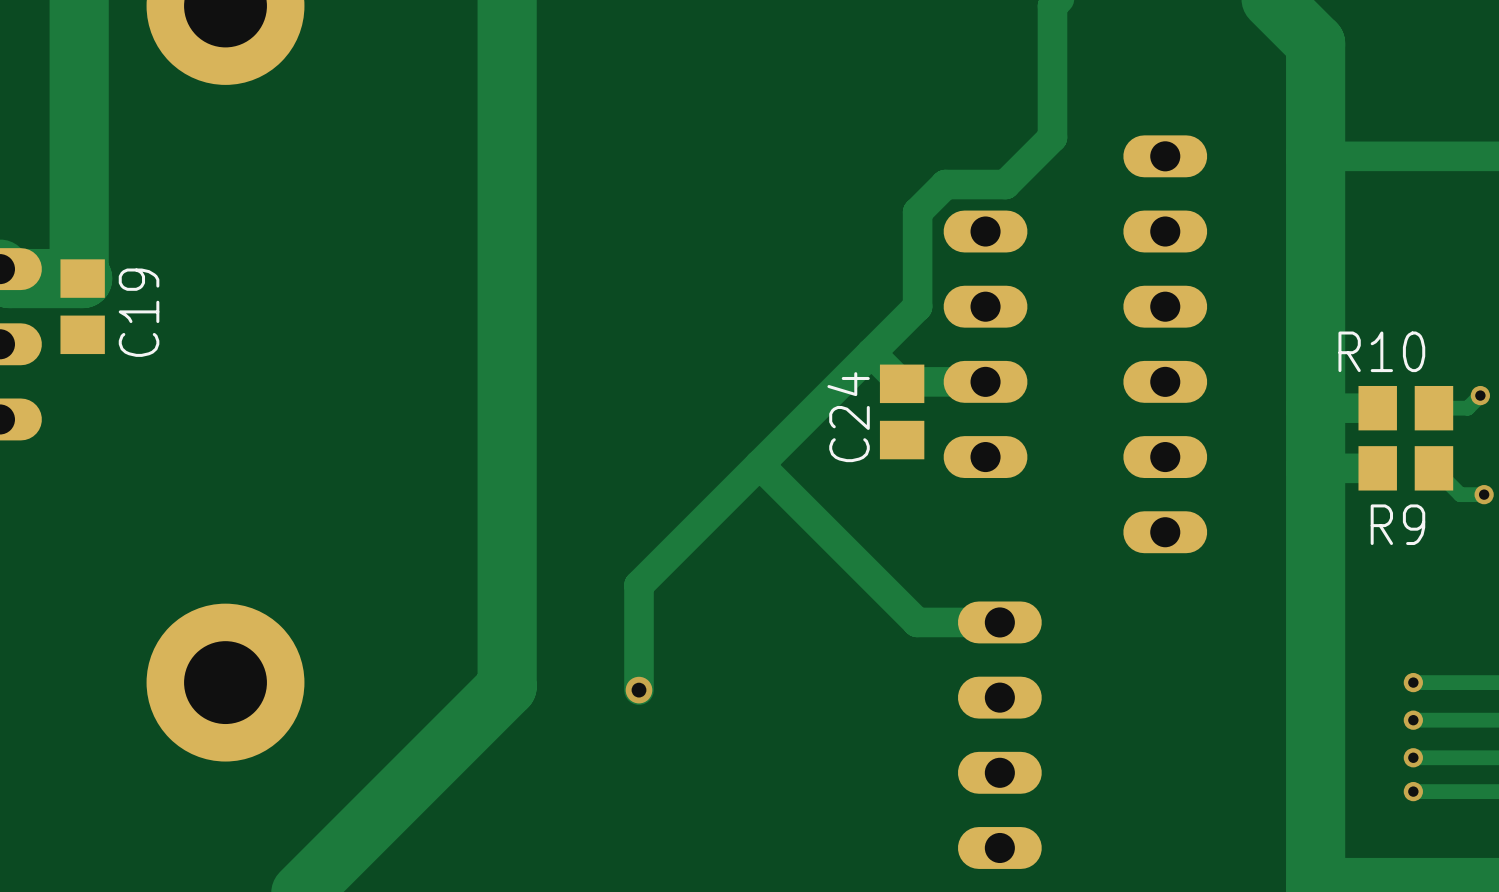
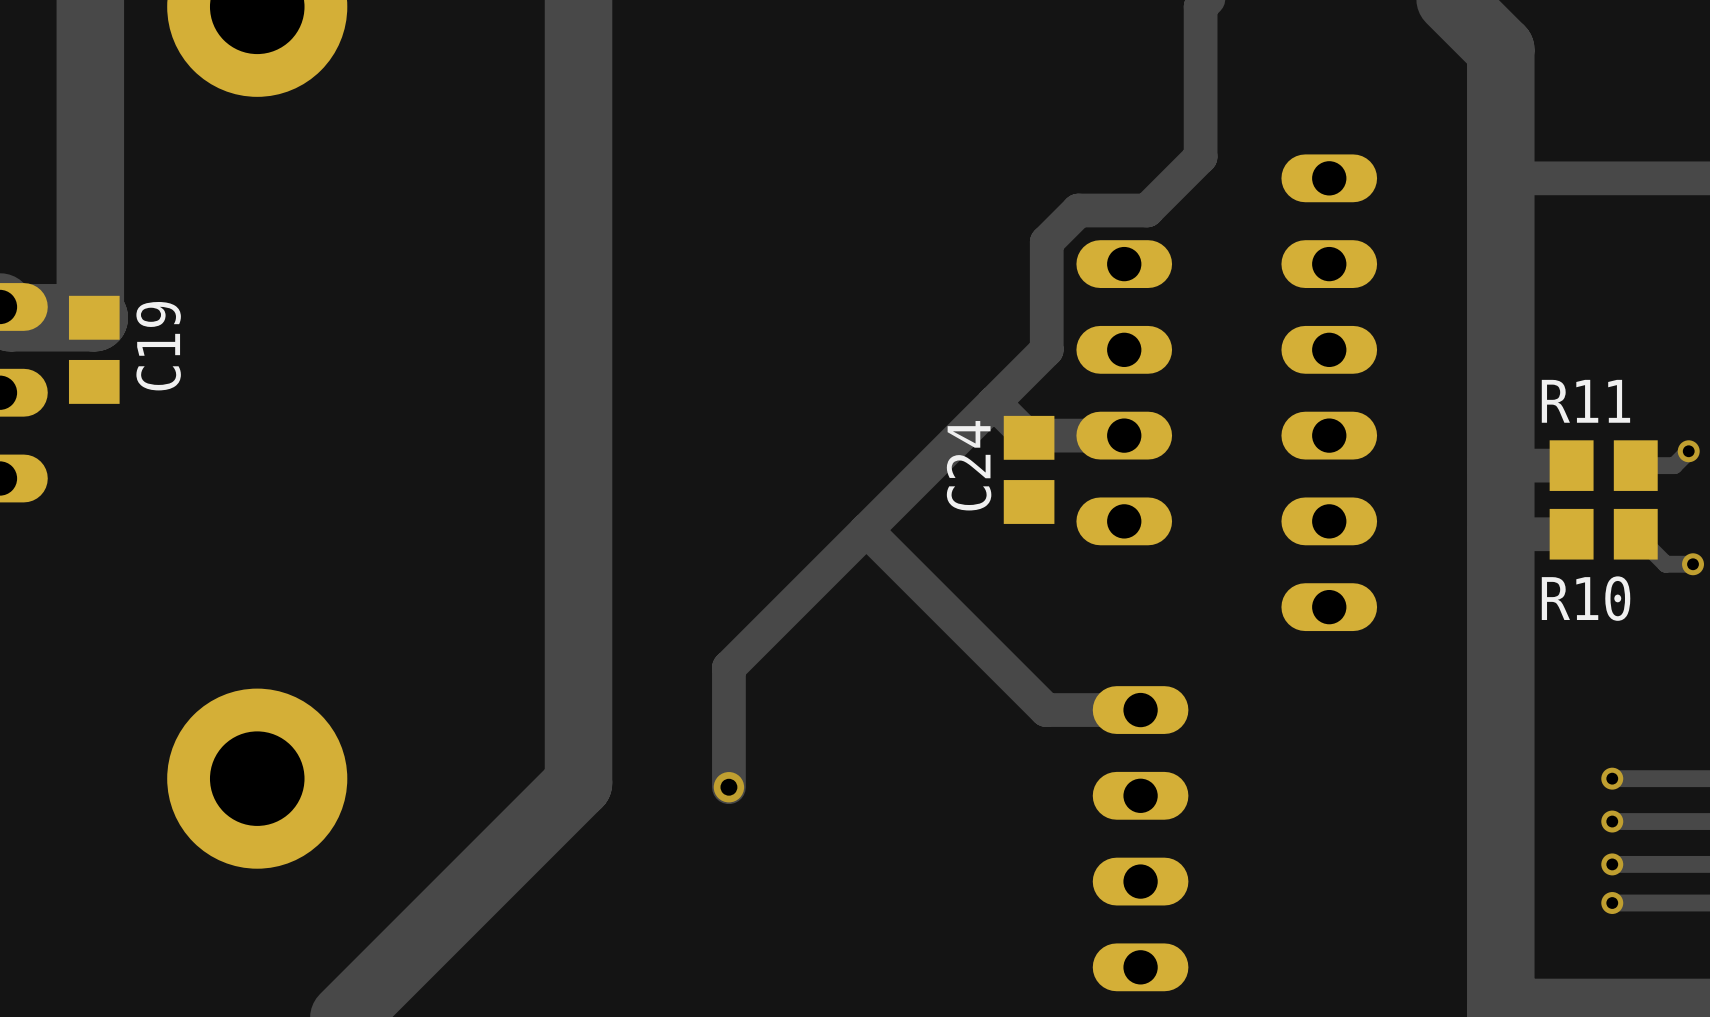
R10 name: R10 (1381, 351) -> R11 (1585, 401)
R9 name: R9 (1397, 524) -> R10 (1586, 598)

